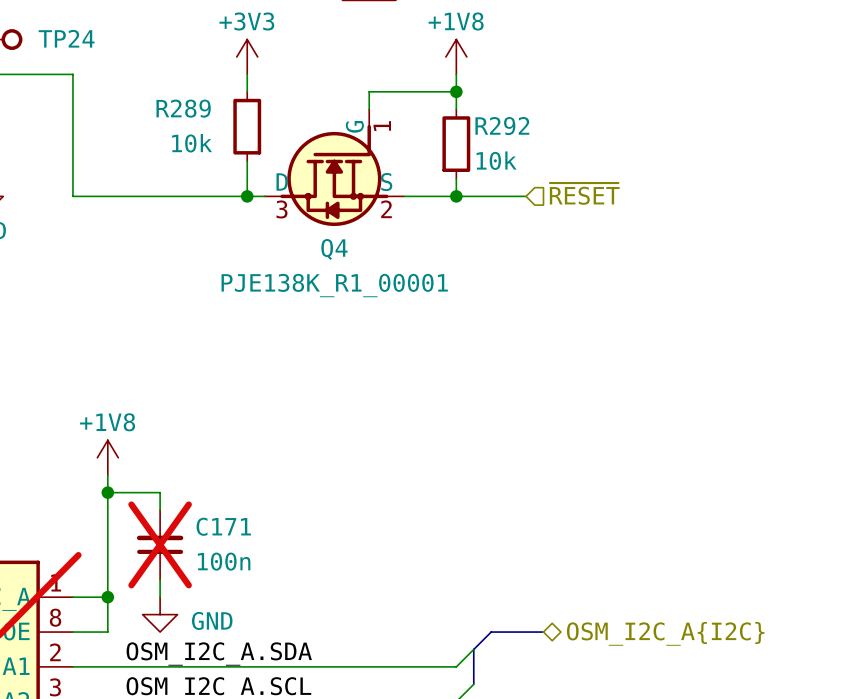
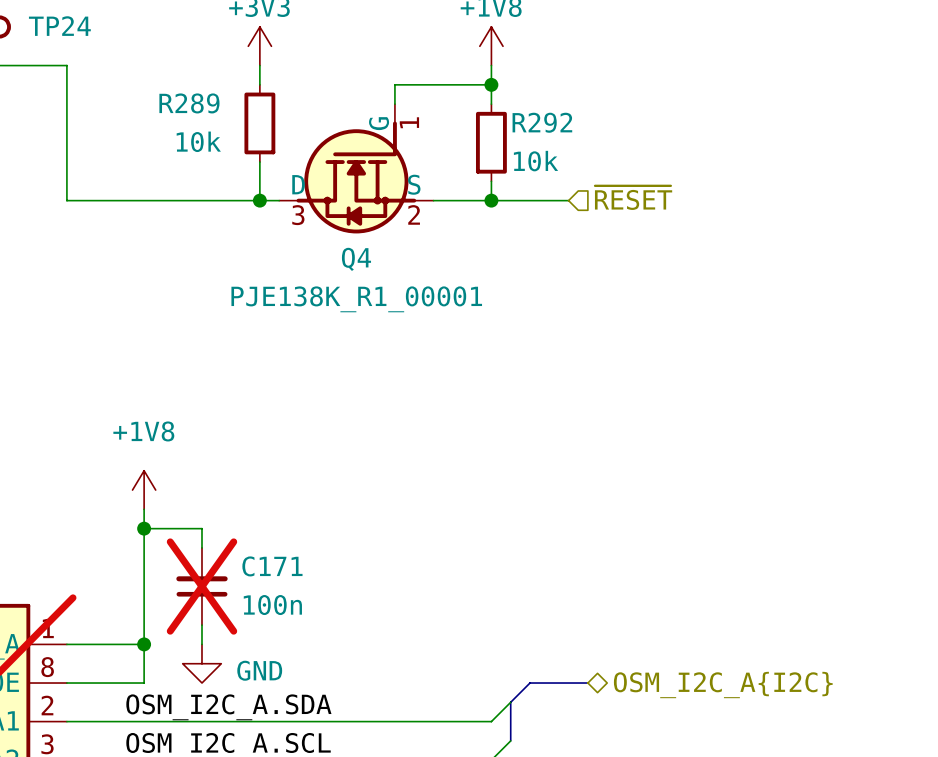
power symbol text position: +1V8 (107, 422) -> +1V8 (143, 431)
power symbol position: +1V8 (107, 457) -> +1V8 (144, 490)
wire: (107, 475) (107, 632) -> (144, 509) (144, 683) (105, 683)
wire: (107, 492) (142, 492) -> (105, 644) (144, 644)
junction position: (107, 492) -> (144, 528)
wire: (160, 492) (160, 510) -> (163, 528) (201, 528) (201, 547)
C171 position: (160, 544) -> (201, 586)
wire: (160, 579) (160, 597) -> (201, 625) (201, 644)
junction position: (107, 597) -> (144, 644)
power symbol position: GND (160, 614) -> GND (201, 663)

